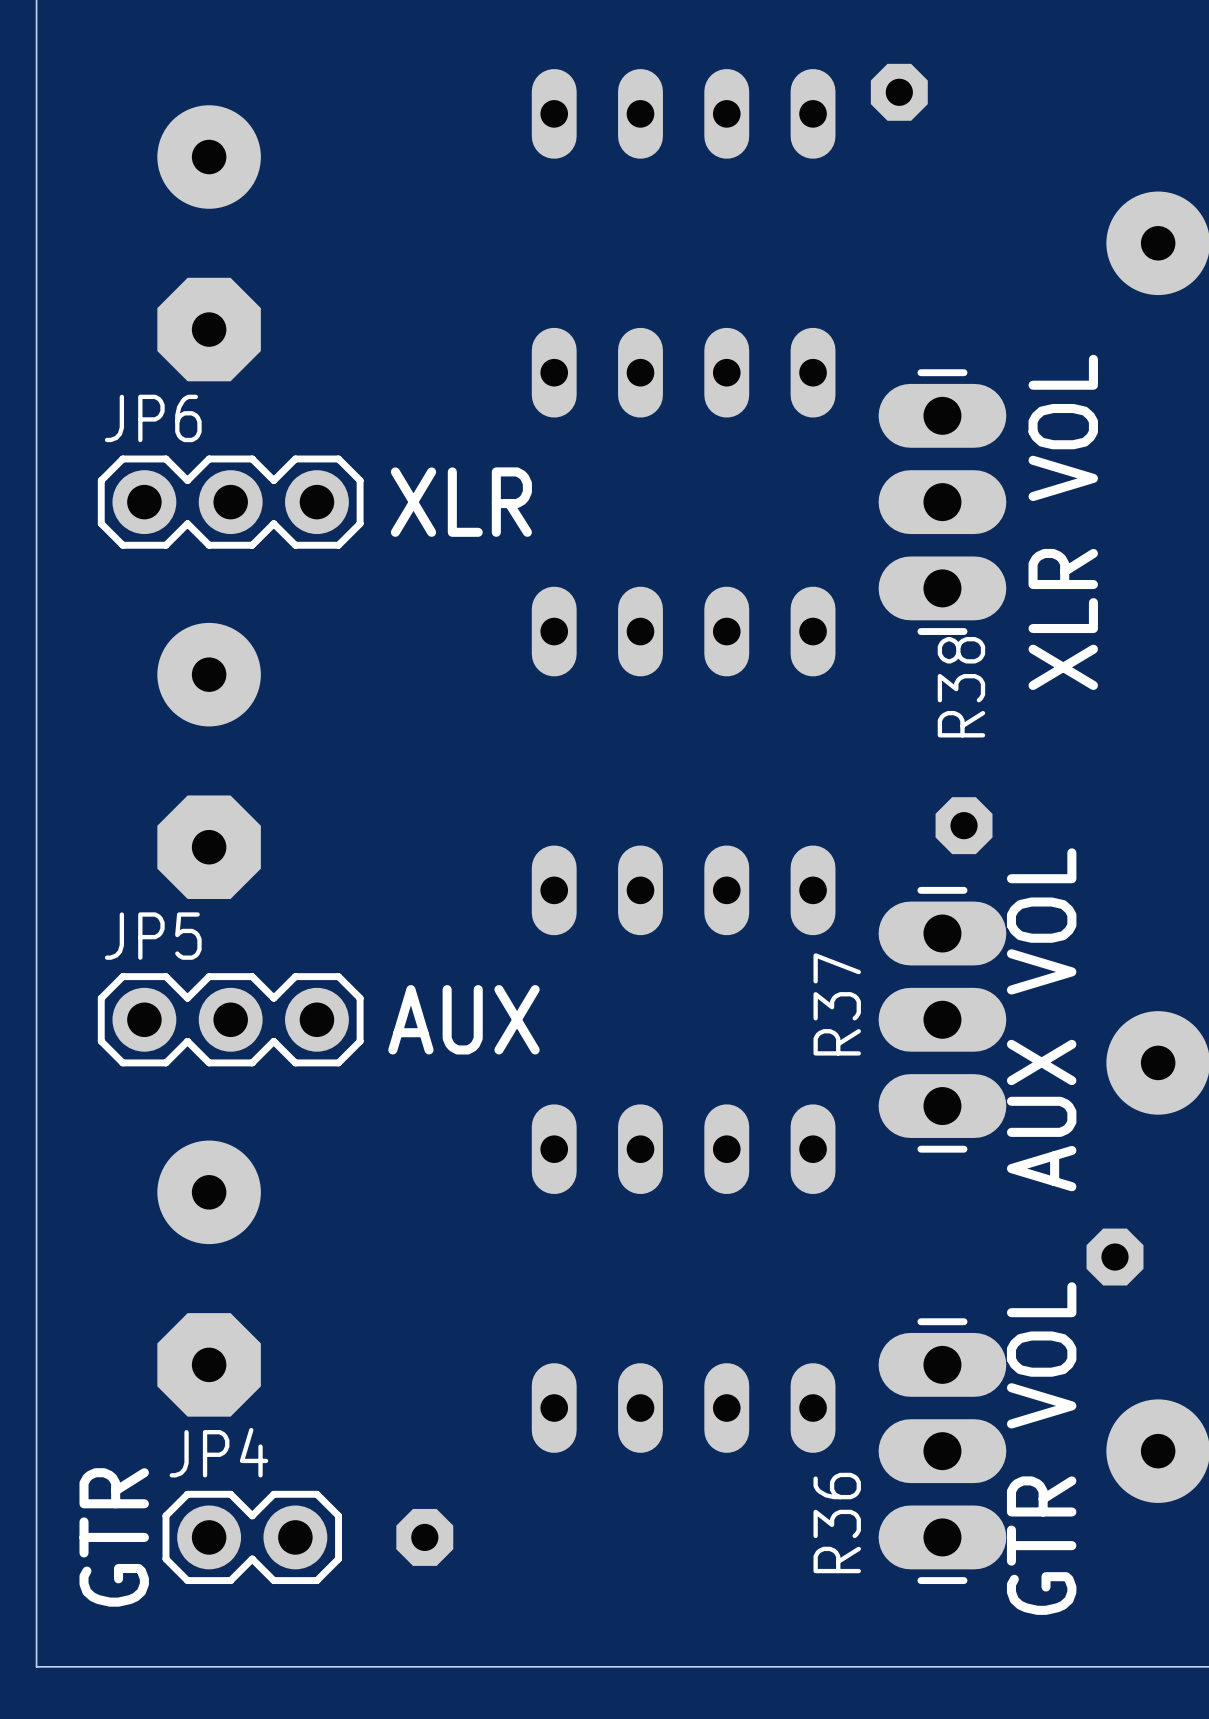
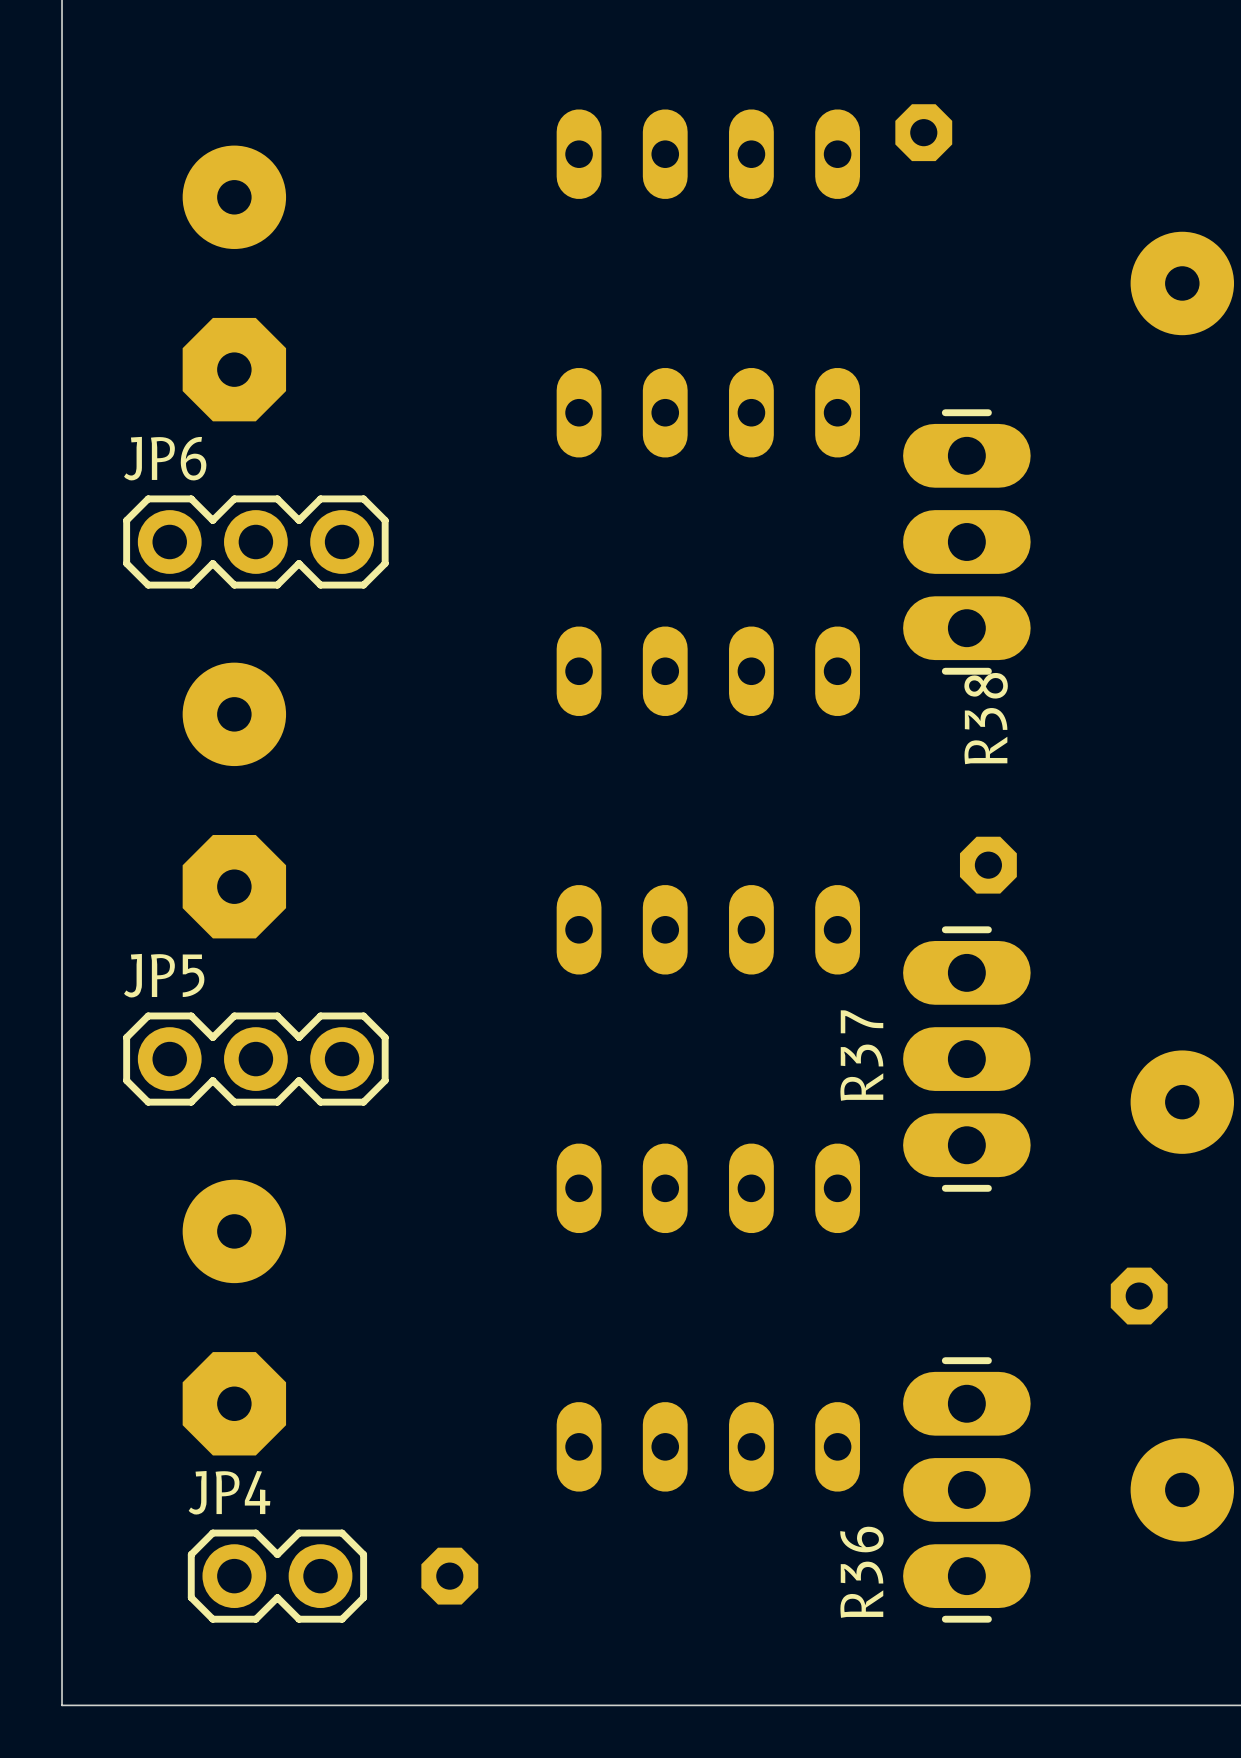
text: XLR (461, 502) -> none
text: XLR VOL (1063, 522) -> none
text: AUX (463, 1019) -> none
text: AUX VOL (1041, 1019) -> none
text: GTR VOL (1041, 1448) -> none
text: GTR (114, 1537) -> none

